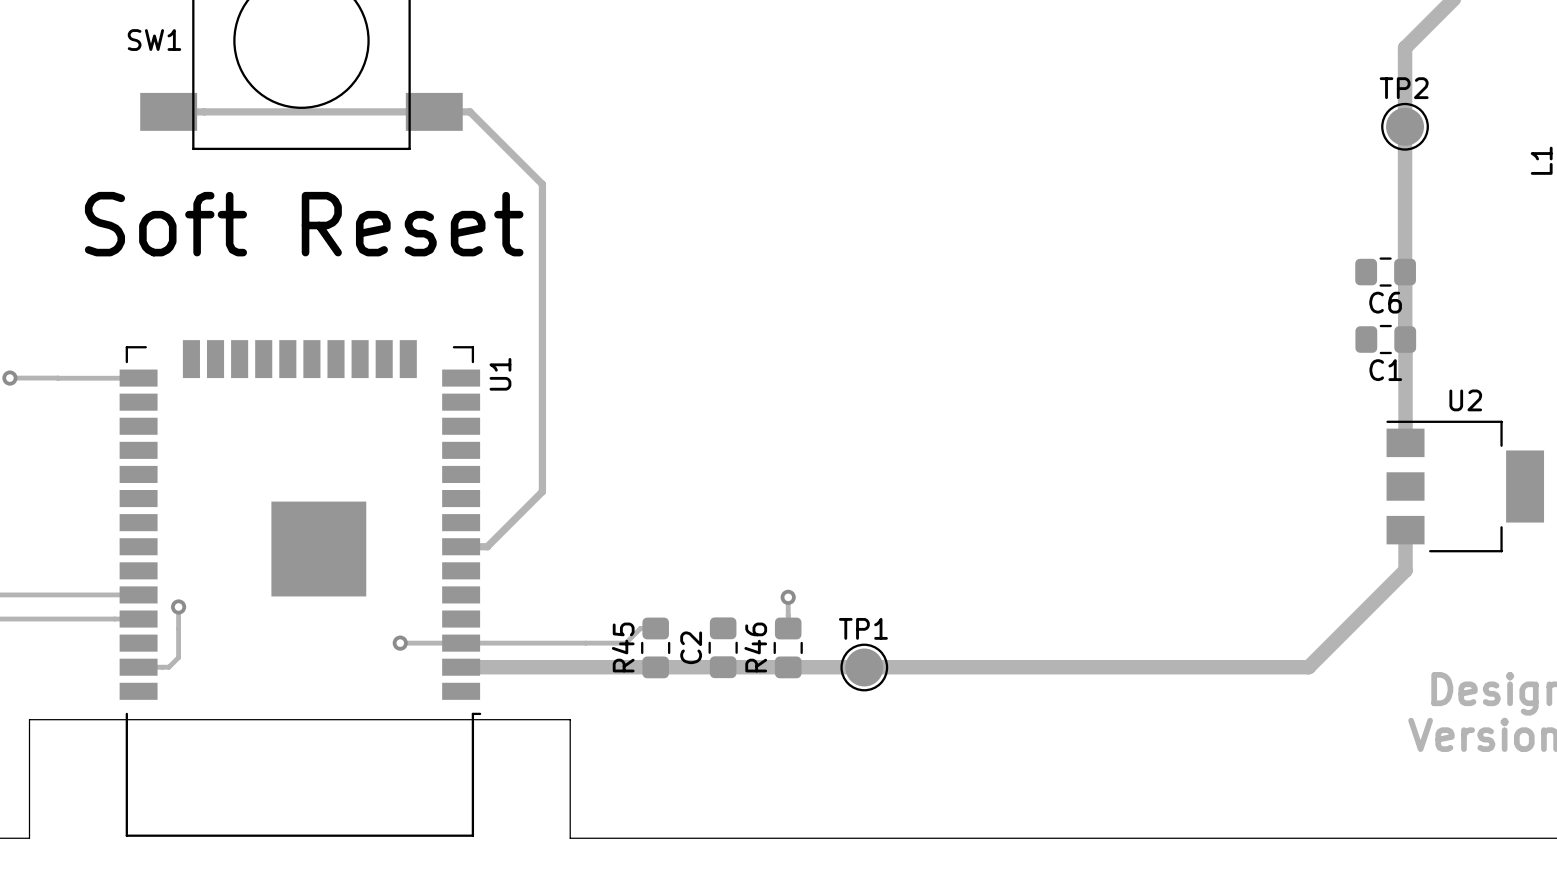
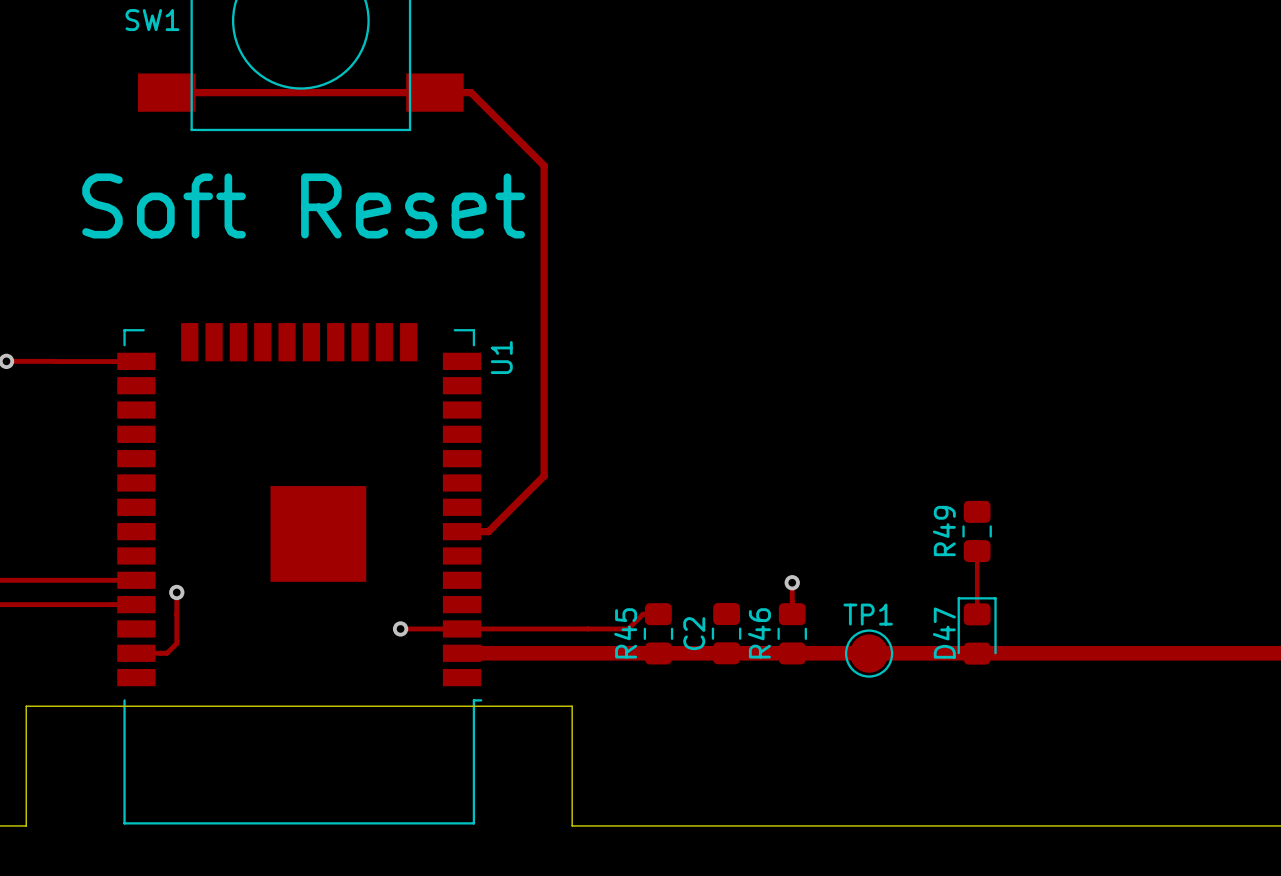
R49: none -> (977, 531)
track: none -> (977, 551) (977, 614)
D47: none -> (977, 630)

